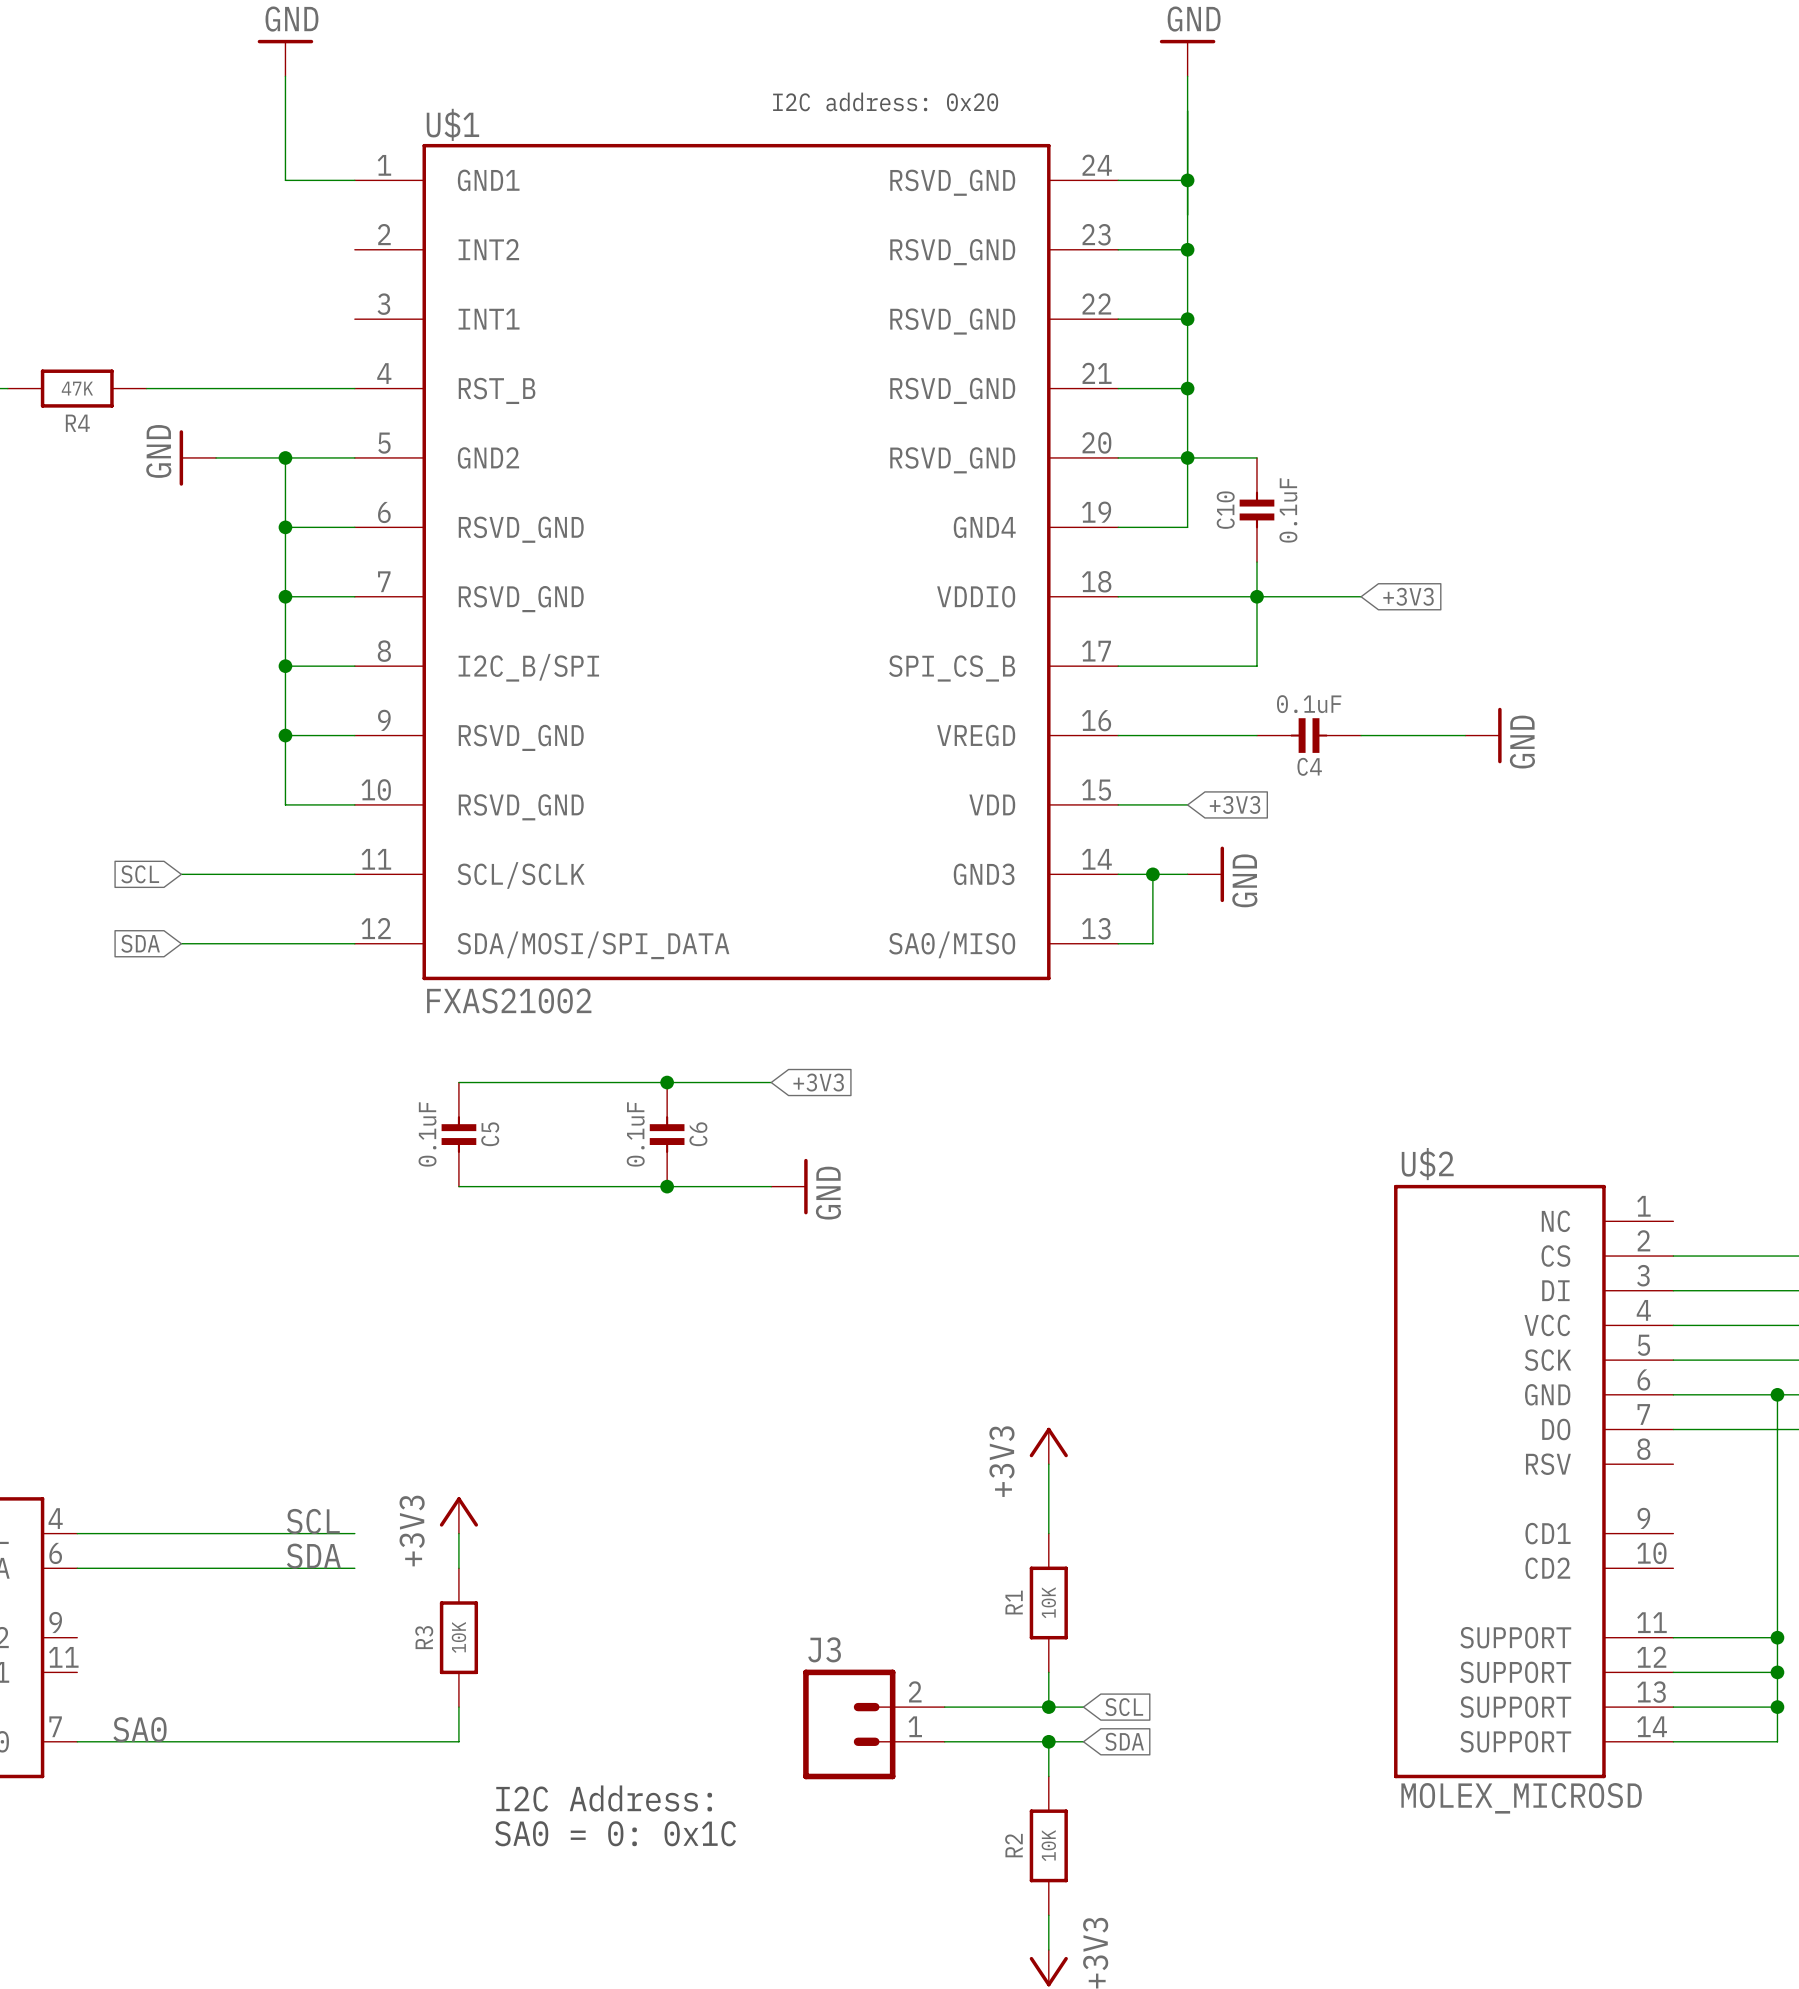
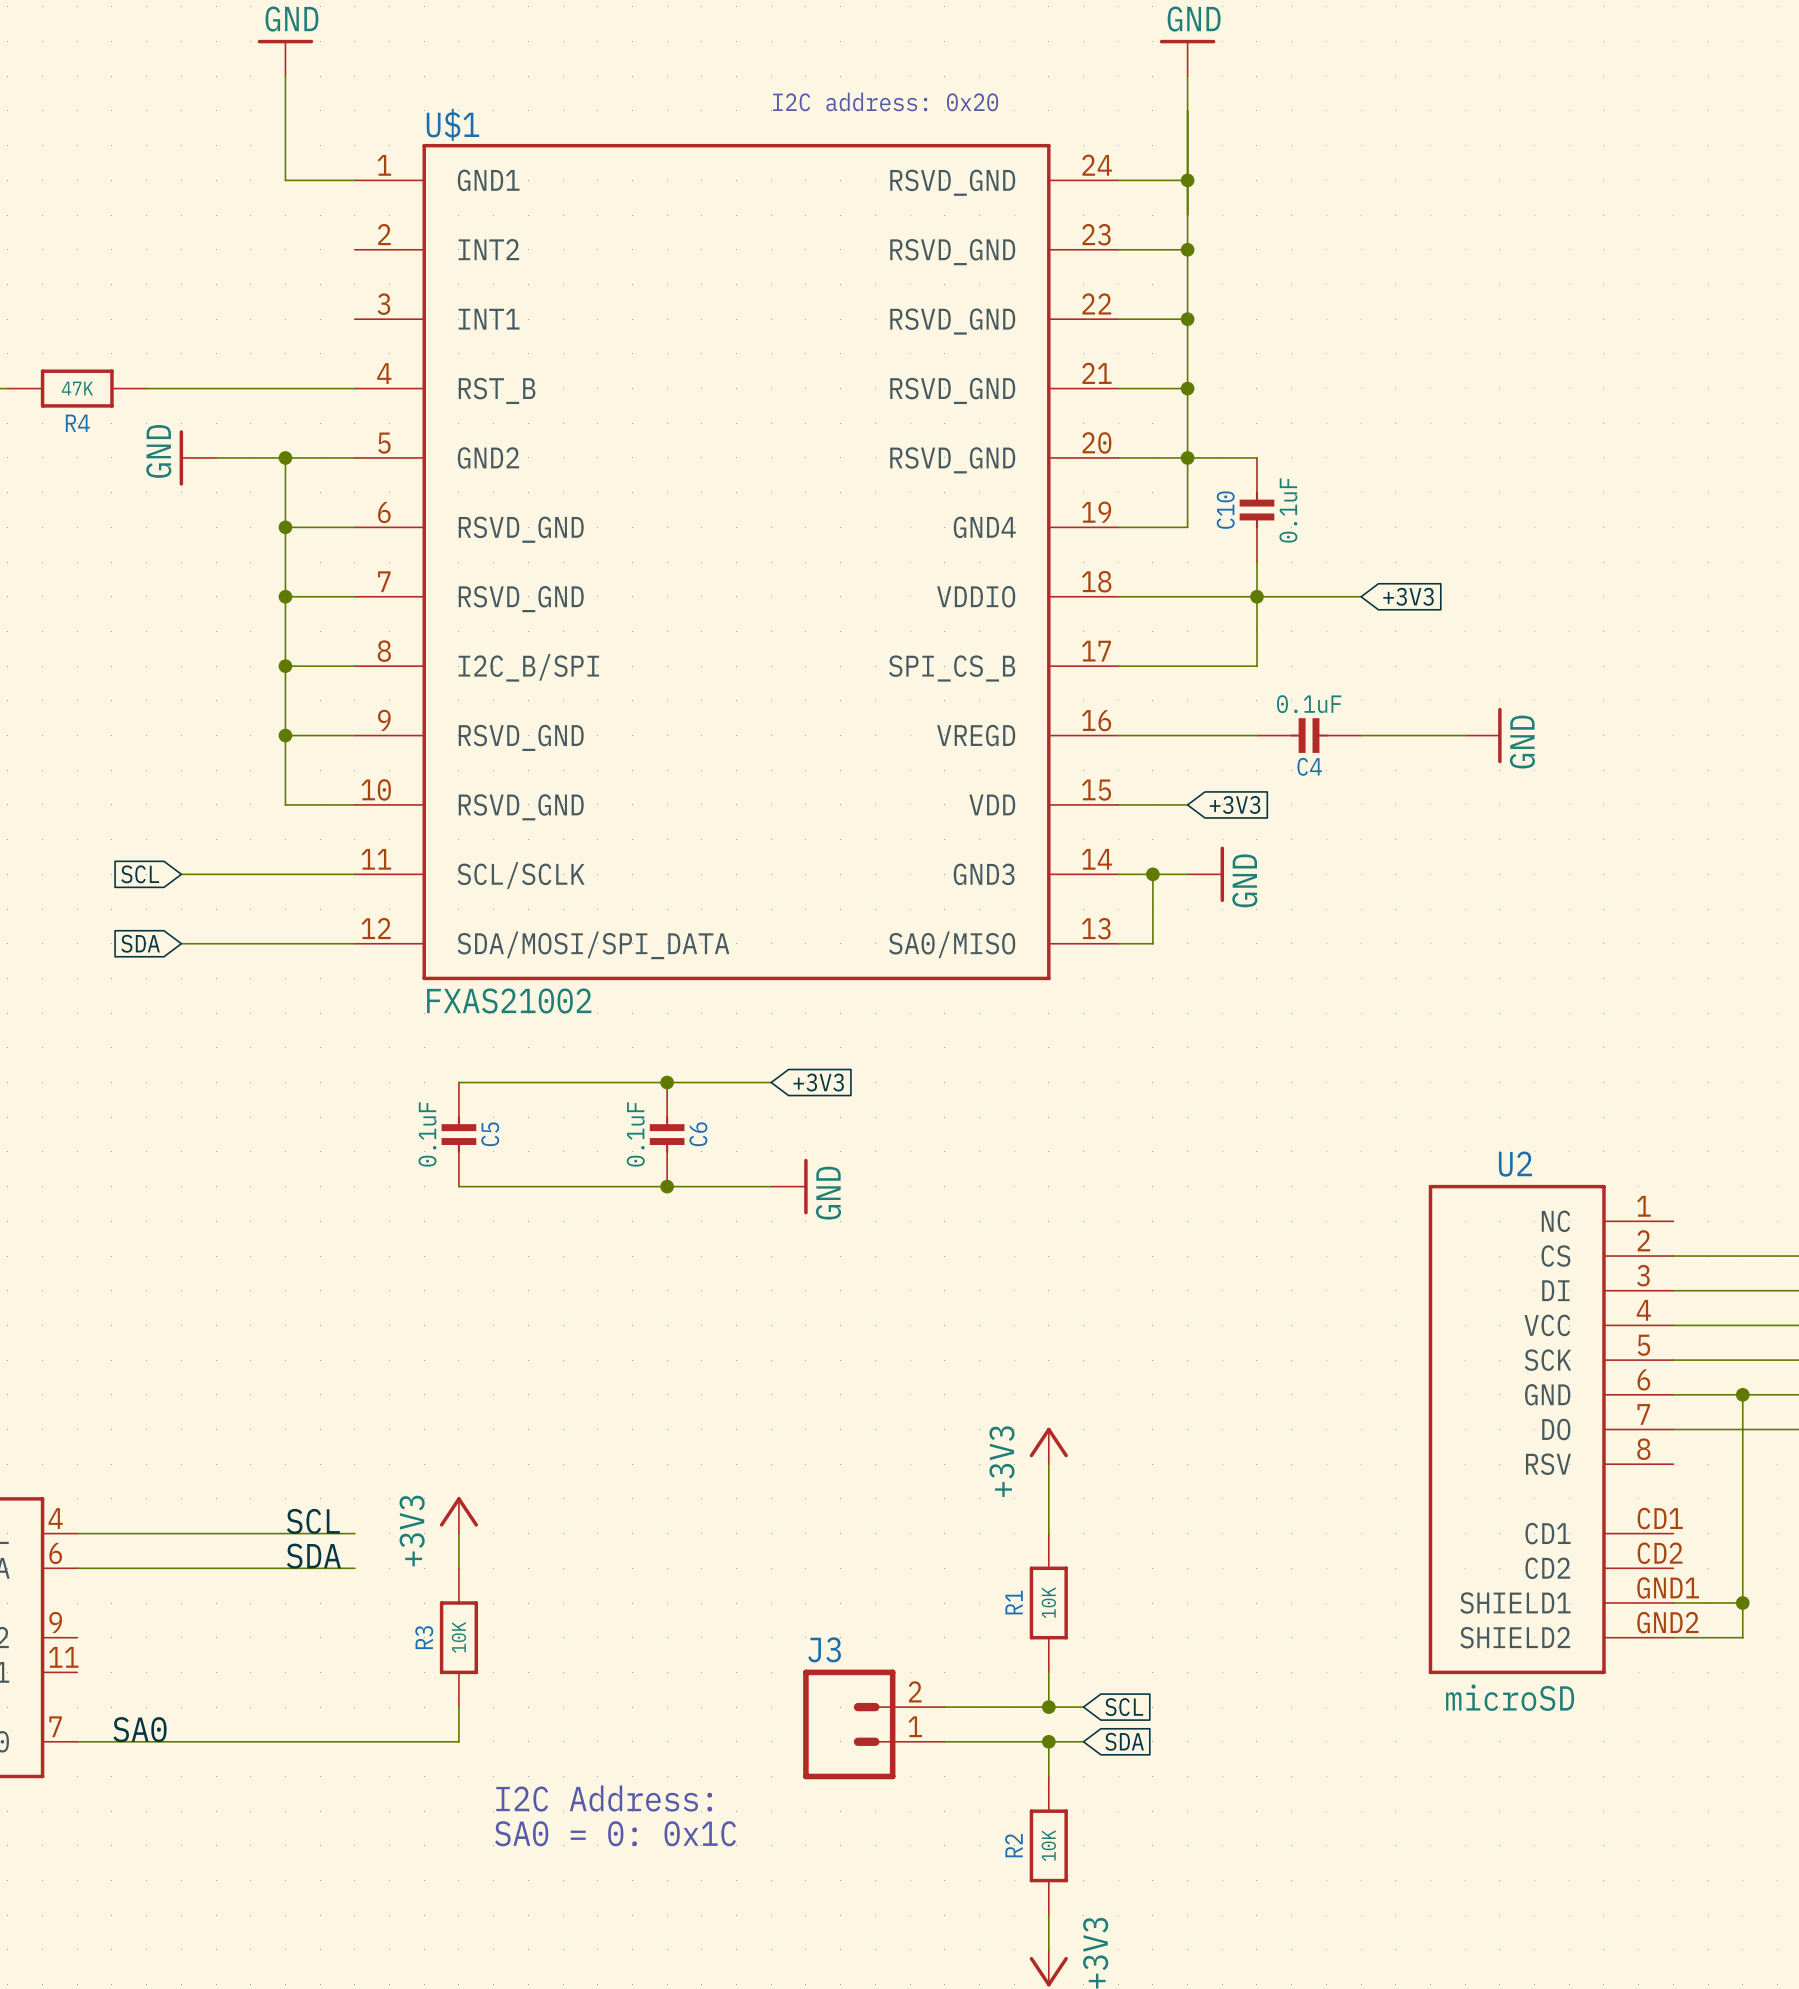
wire: (1777, 1394) (1777, 1741) (1673, 1741) -> none
junction position: (1777, 1394) -> (1742, 1394)
U2: none -> microSD (1551, 1429)
U$2: MOLEX_MICROSD (1533, 1481) -> none
wire: none -> (1673, 1603) (1742, 1603)
junction: none -> (1742, 1603)
wire: (1742, 1637) (1777, 1637) -> (1742, 1637) (1742, 1394)
junction: (1777, 1637) -> none
wire: (1673, 1672) (1777, 1672) -> none
junction: (1777, 1672) -> none
wire: (1673, 1707) (1777, 1707) -> none
junction: (1777, 1707) -> none

